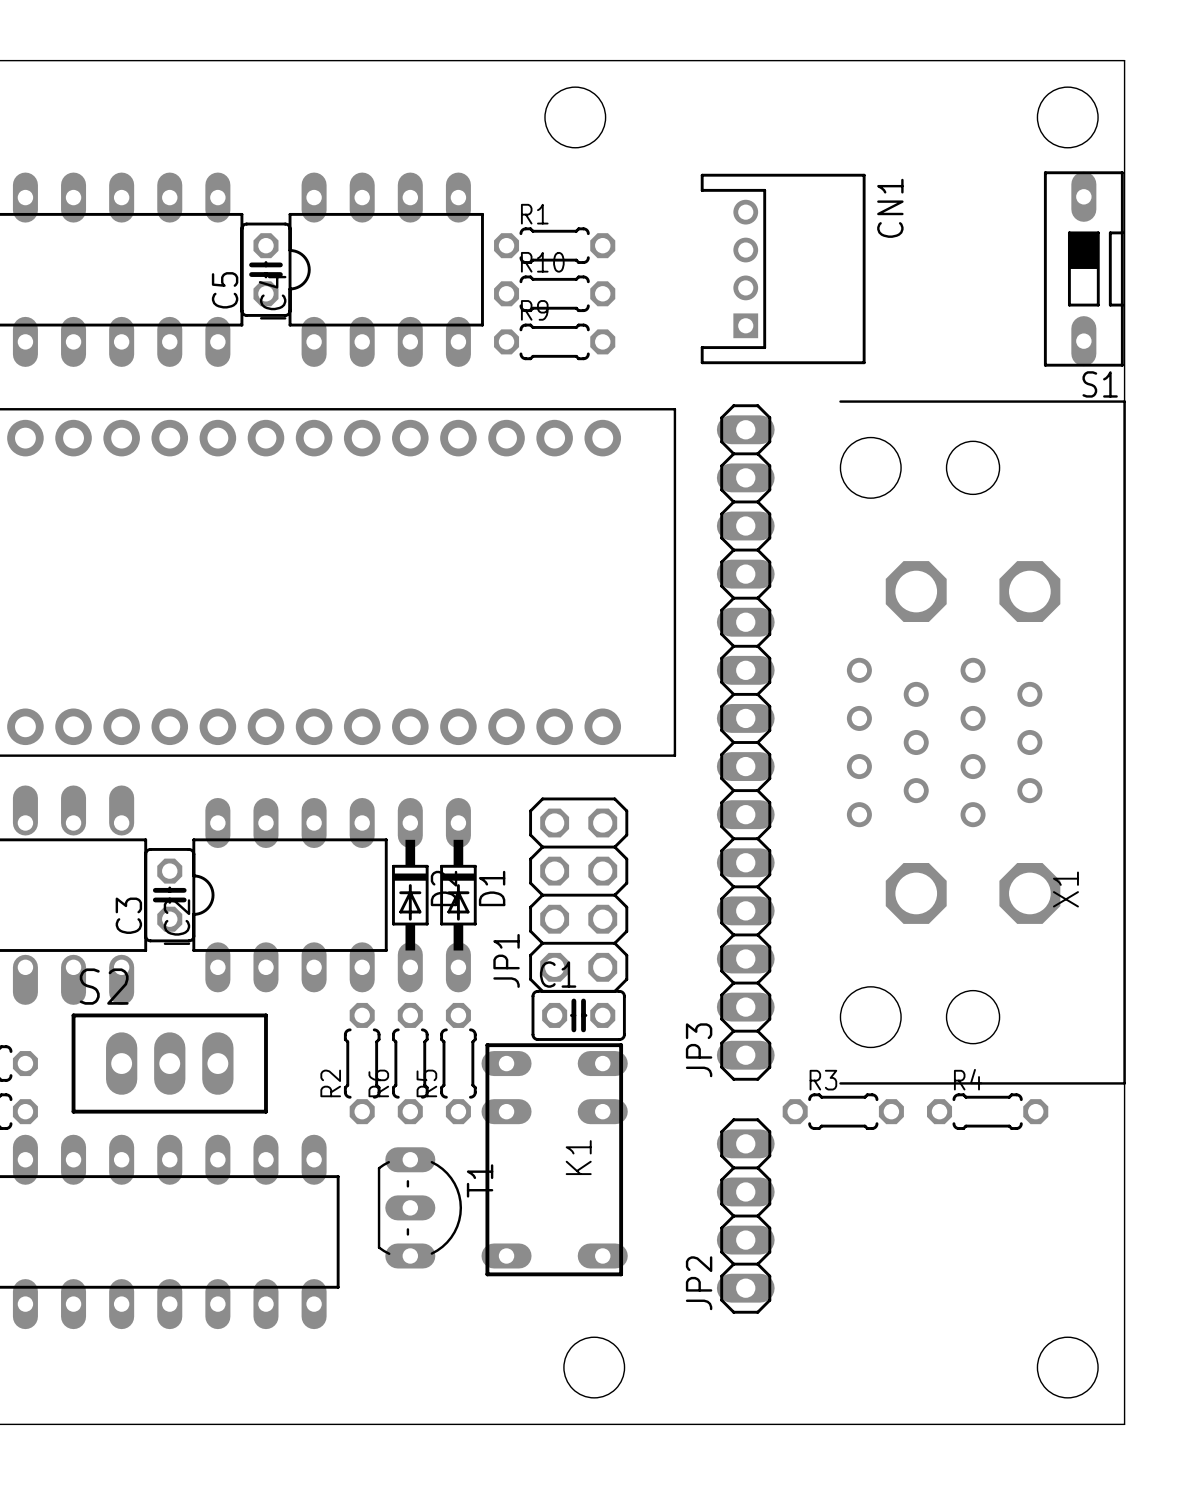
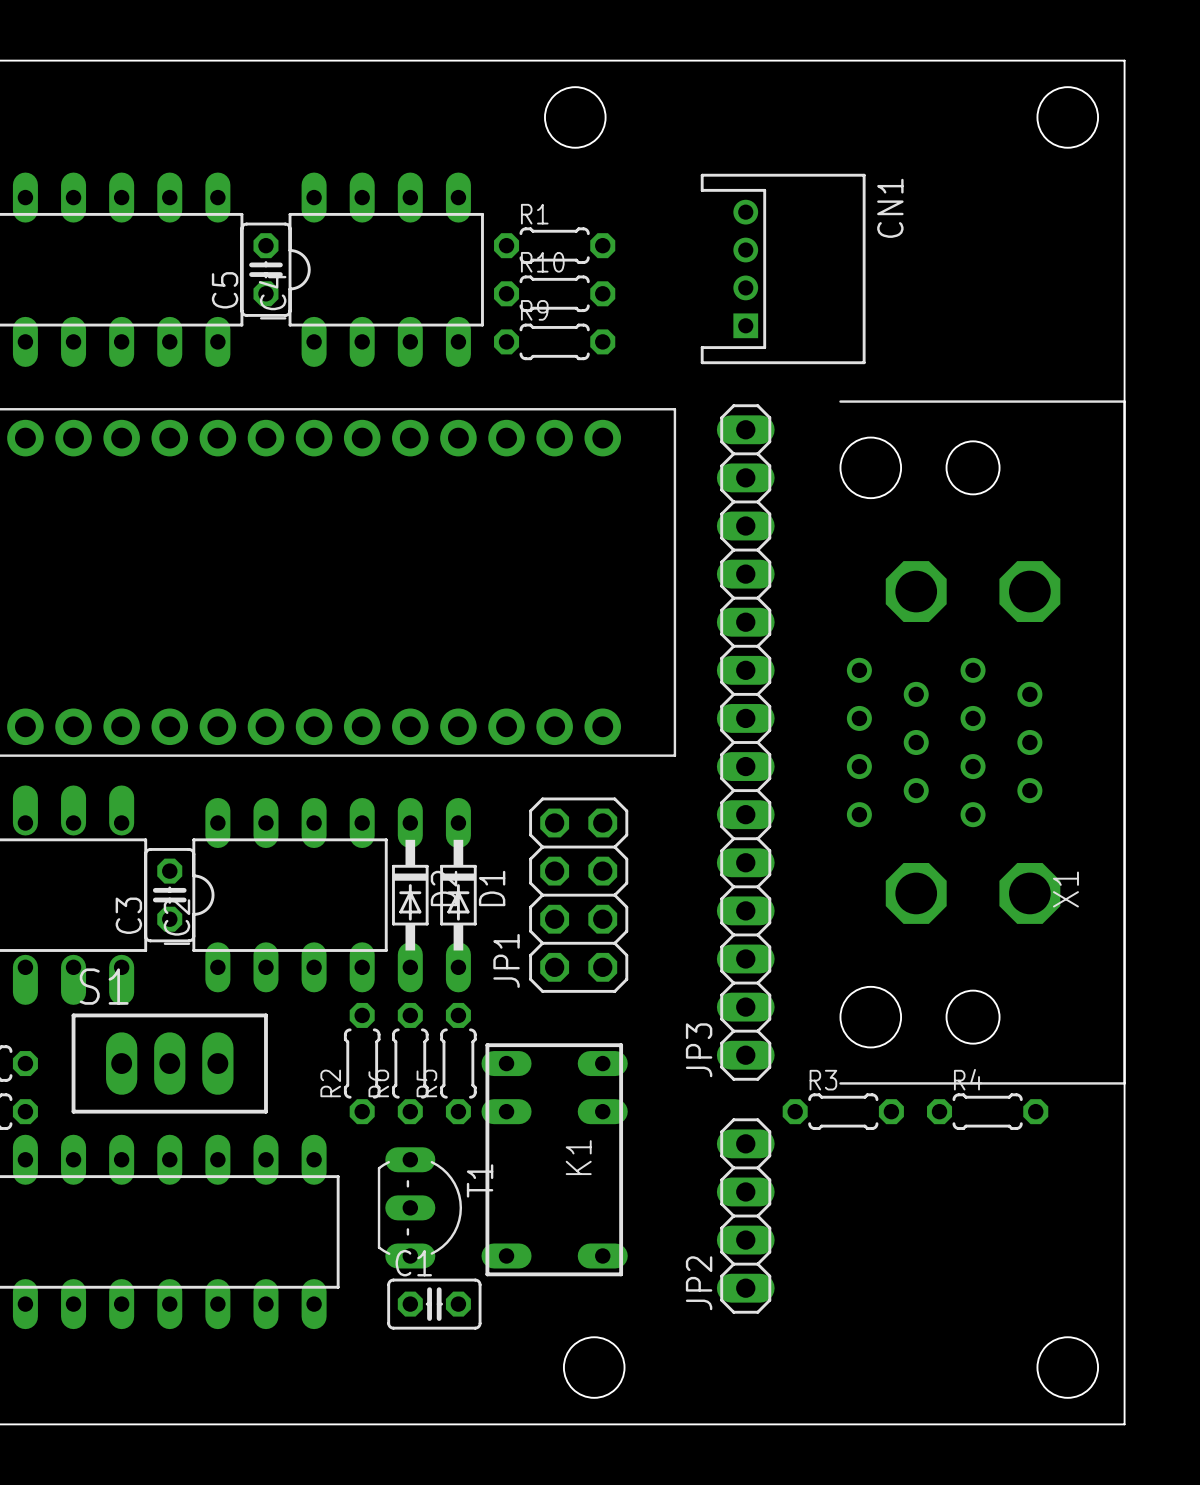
S1: (1083, 268) -> none
S2 name: S2 (104, 986) -> S1 (104, 986)
C1 position: (578, 1015) -> (434, 1304)

